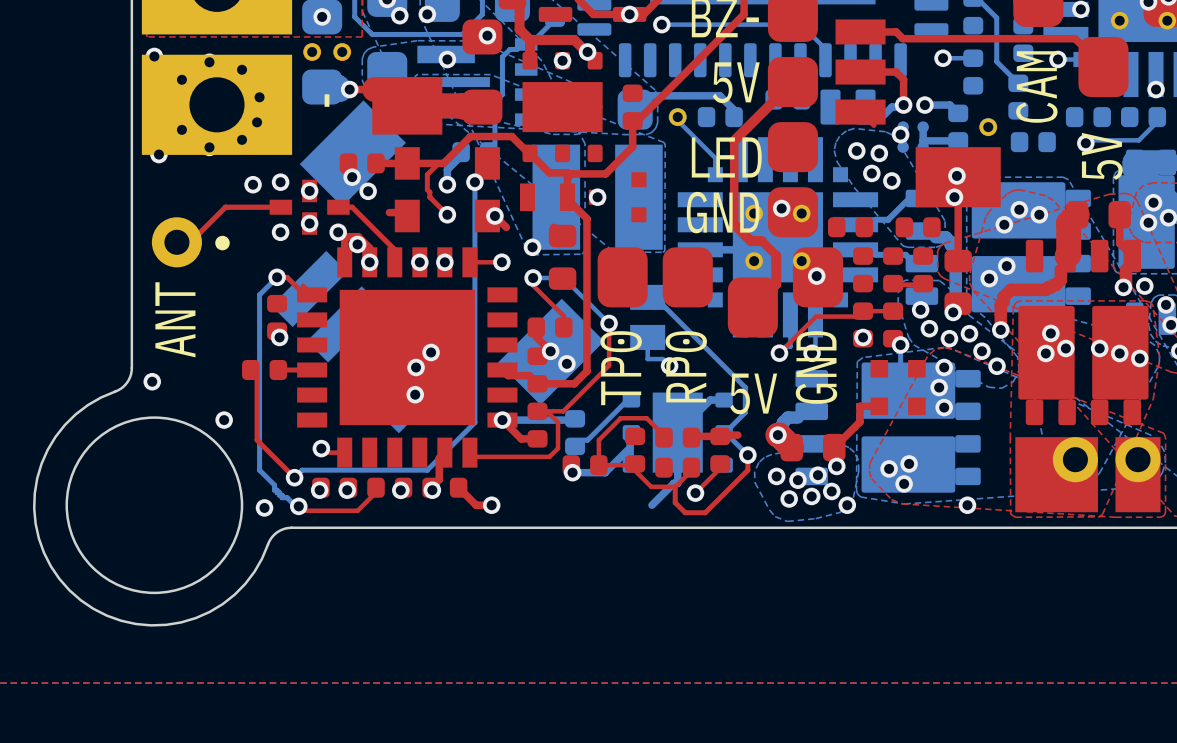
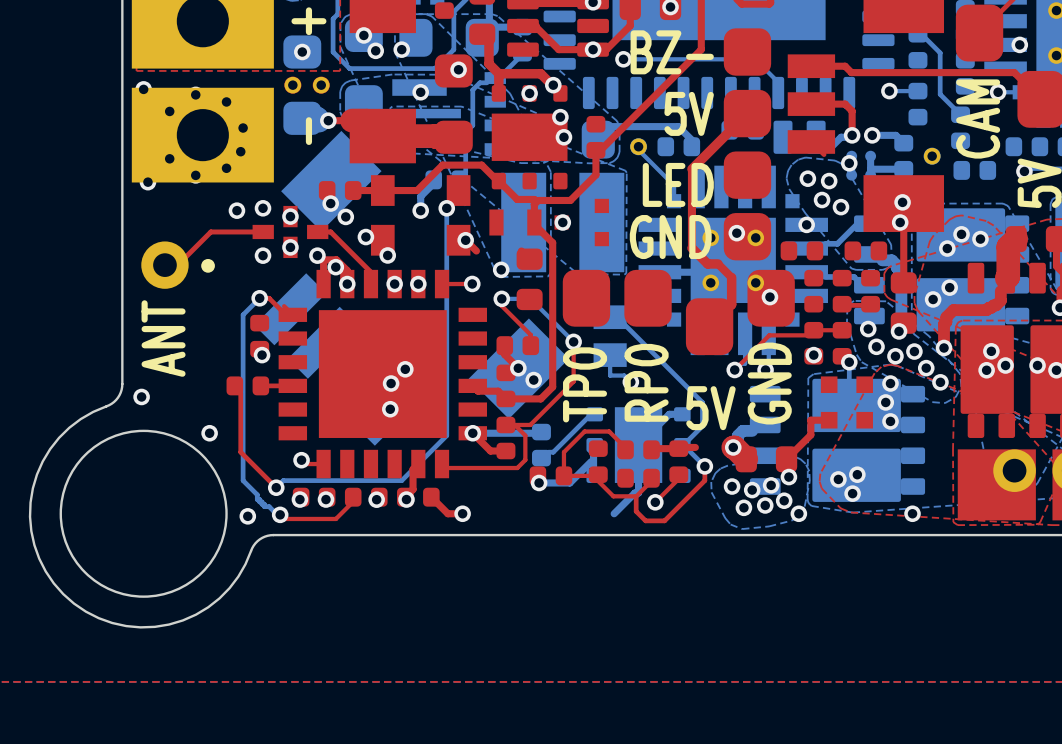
via: none -> (560, 117)
via: none -> (563, 137)
top track: (437, 164) (427, 174) (427, 189) (429, 192) (429, 197) (447, 214) -> none
via: none -> (806, 224)
via: none -> (365, 237)
via: (447, 214) -> none
via: none -> (387, 255)

